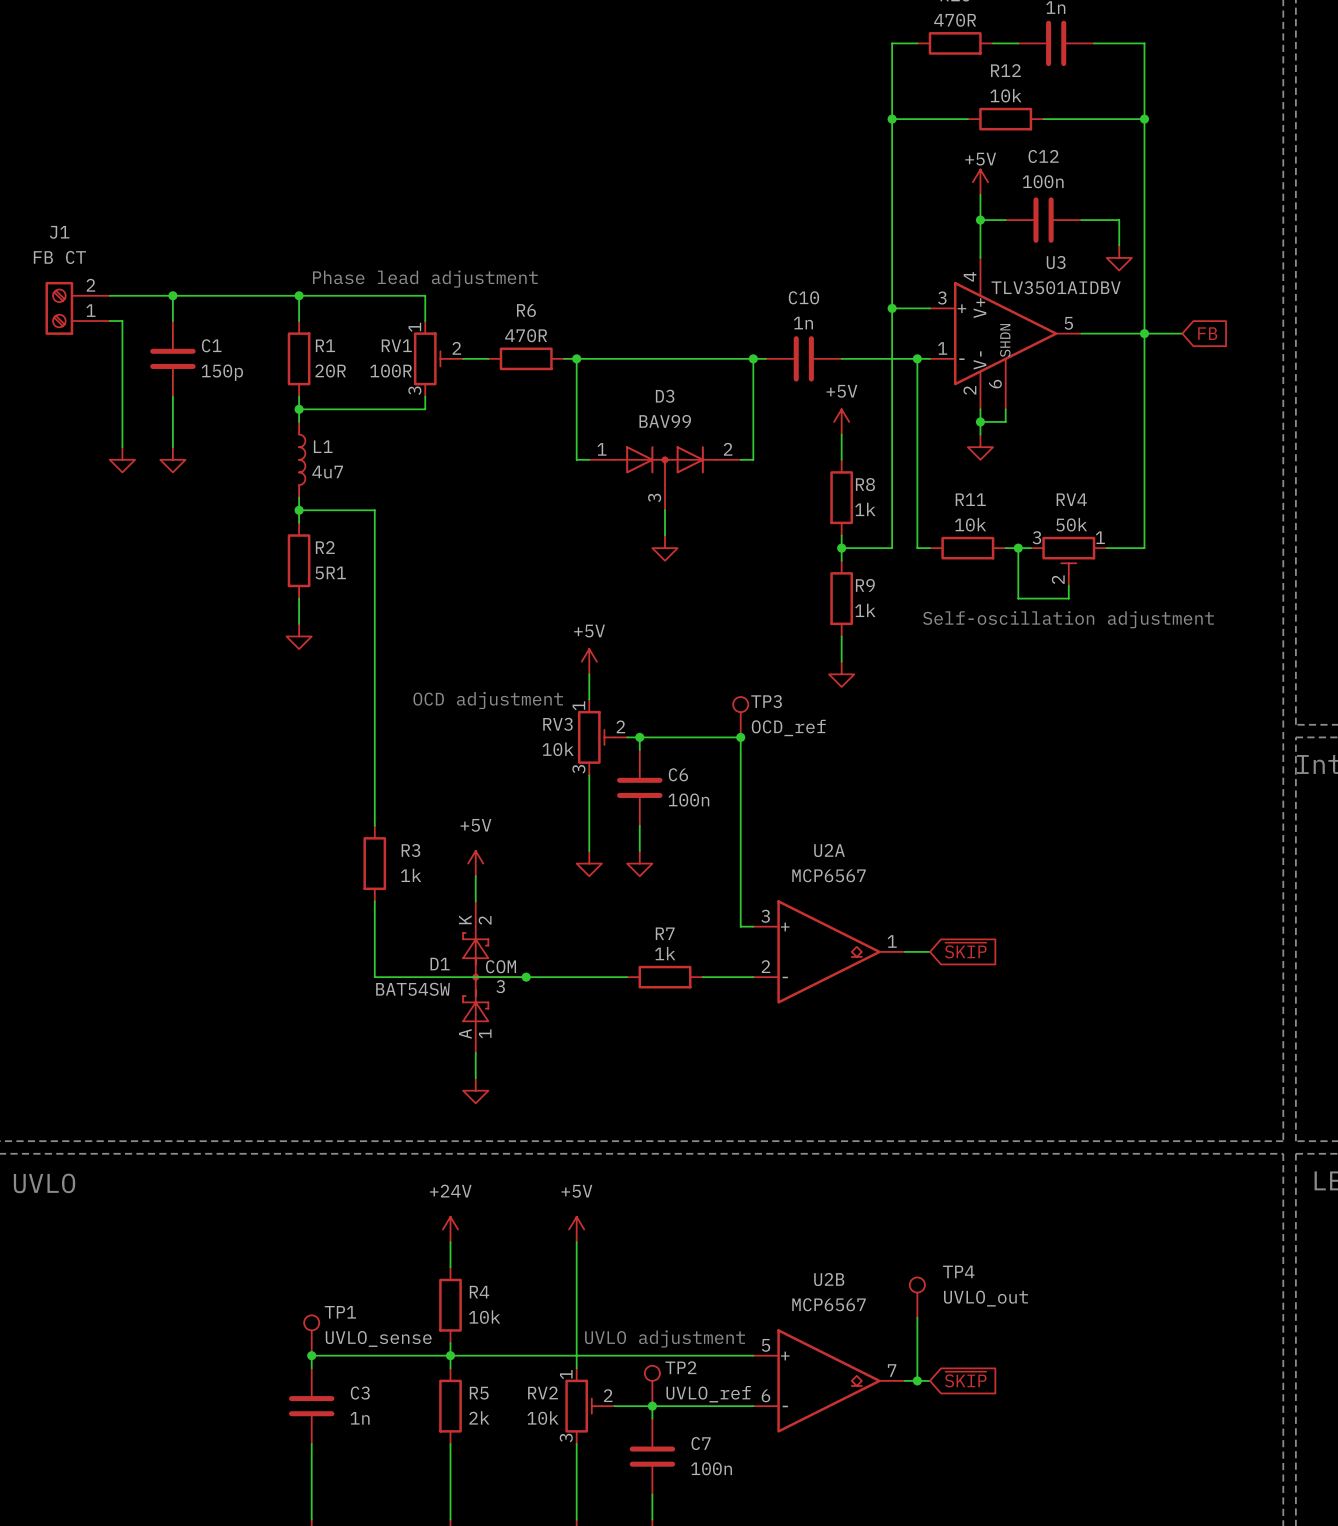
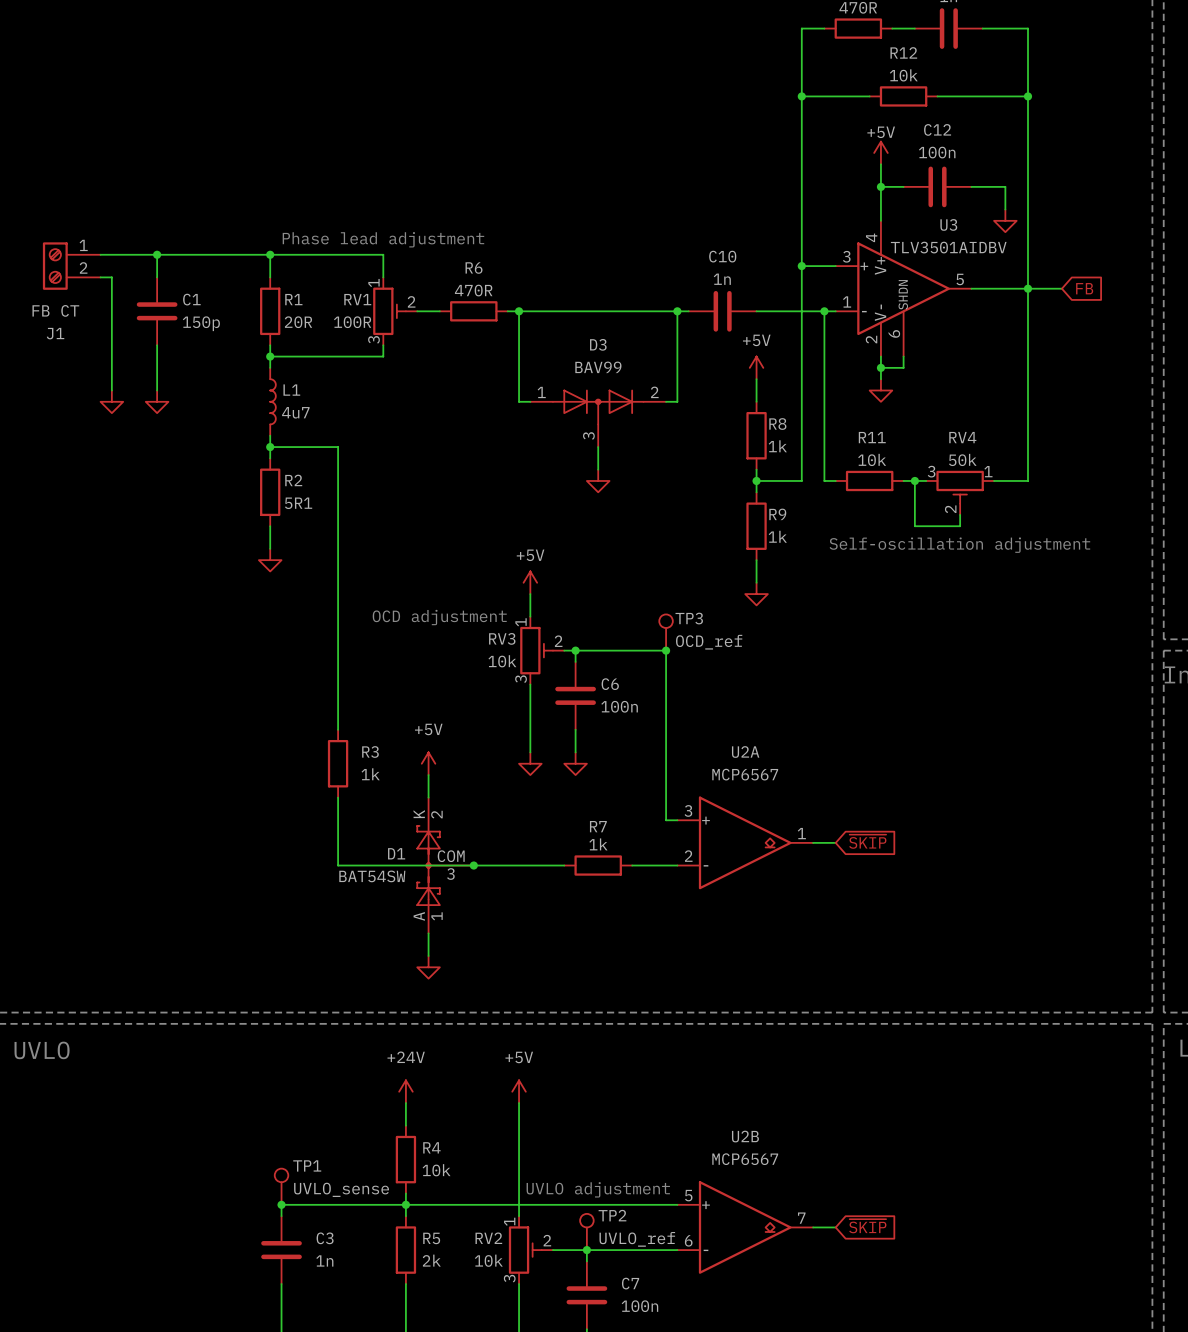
J1 flip: as is (59, 308) -> up-down (55, 266)
TP4: UVLO_out (917, 1297) -> none
wire: (917, 1317) (917, 1380) -> none
junction: (917, 1380) -> none

